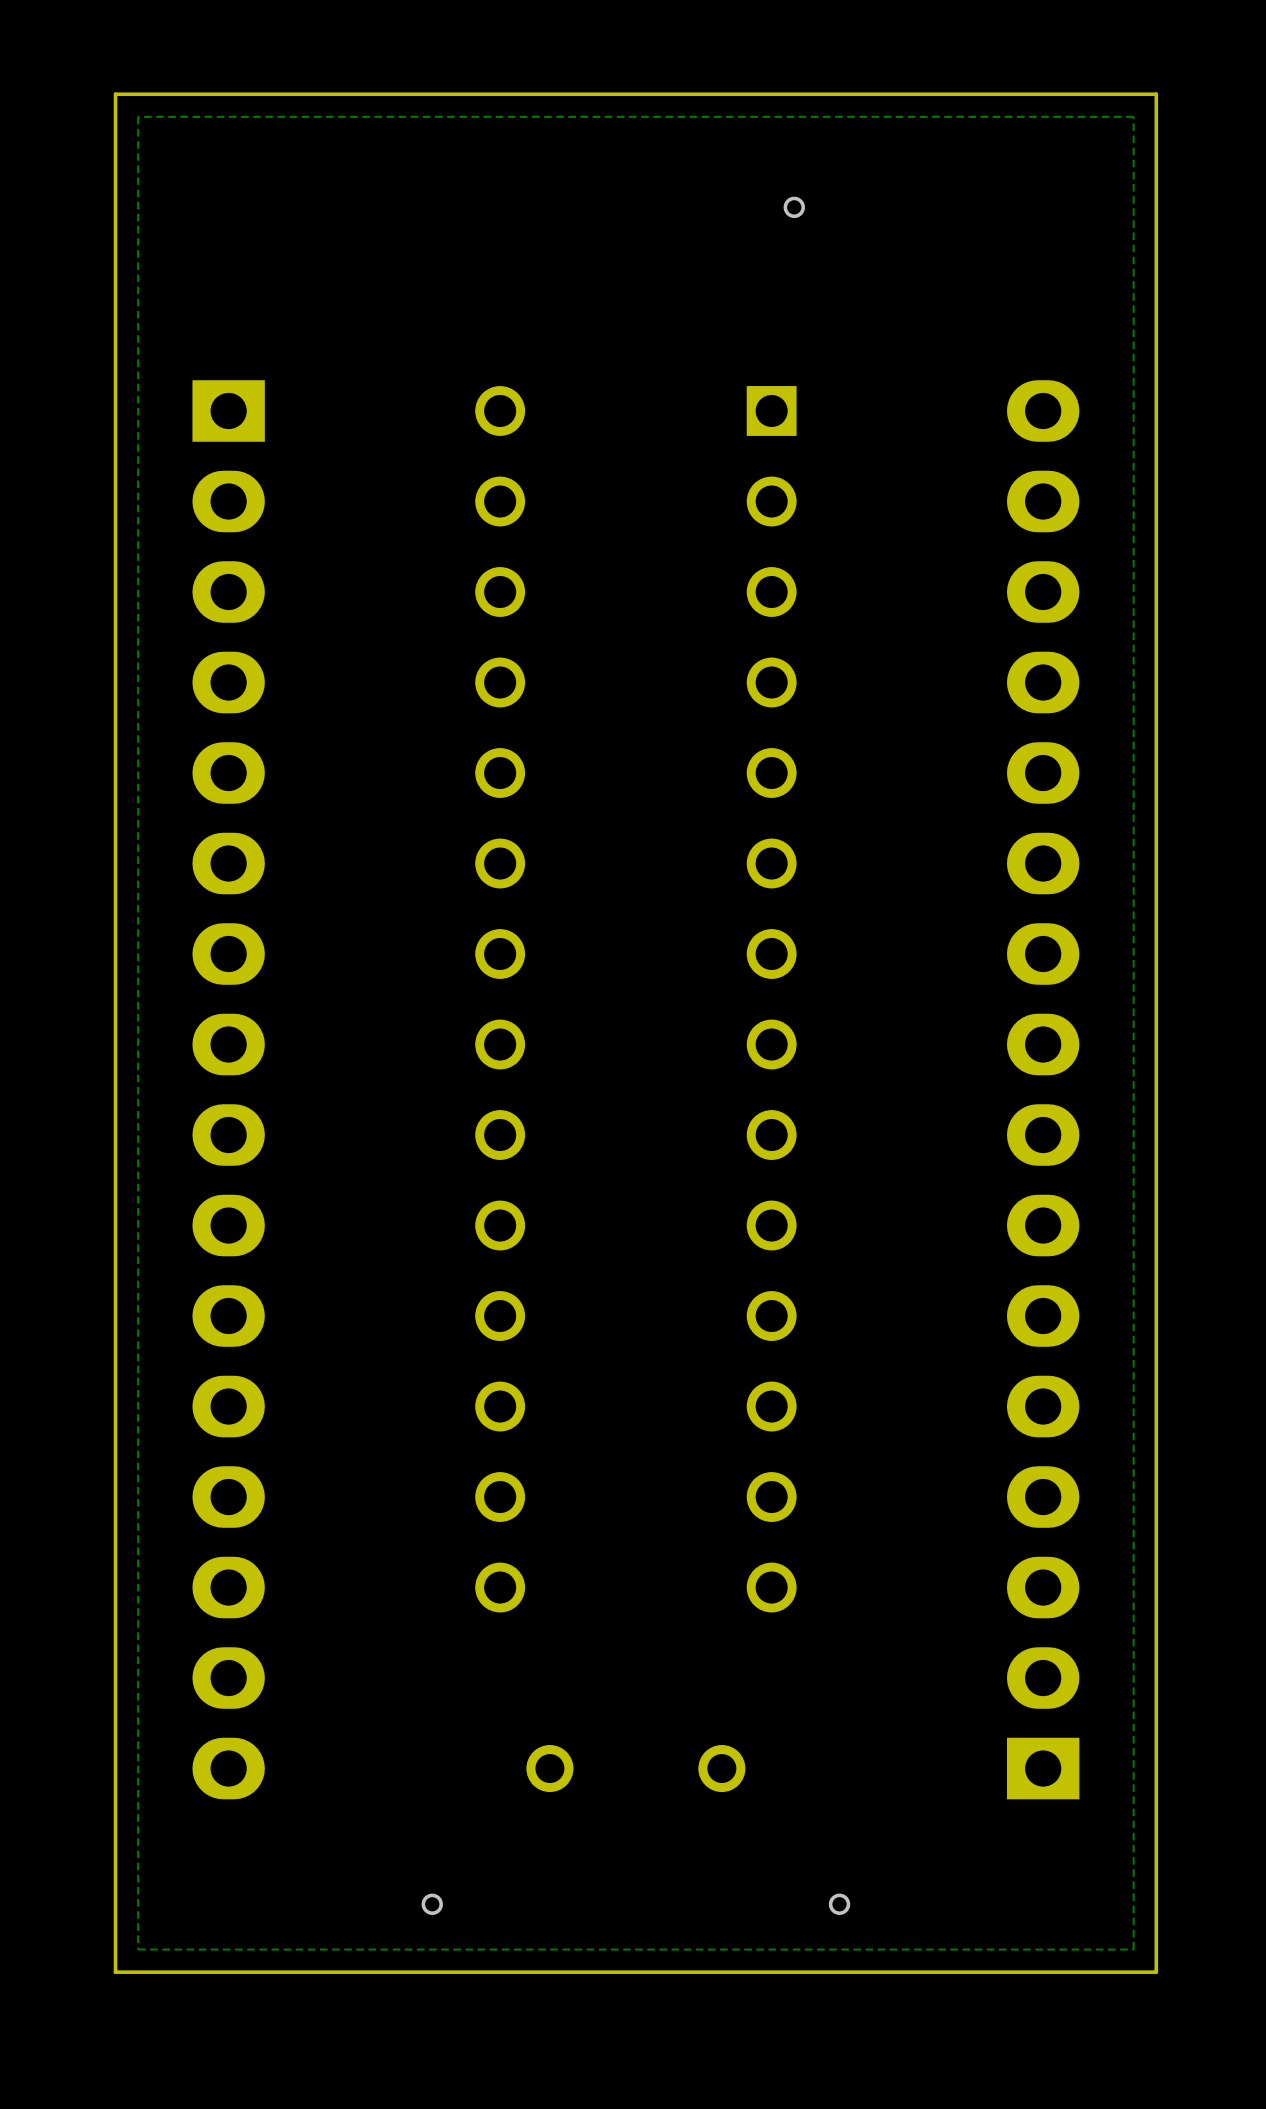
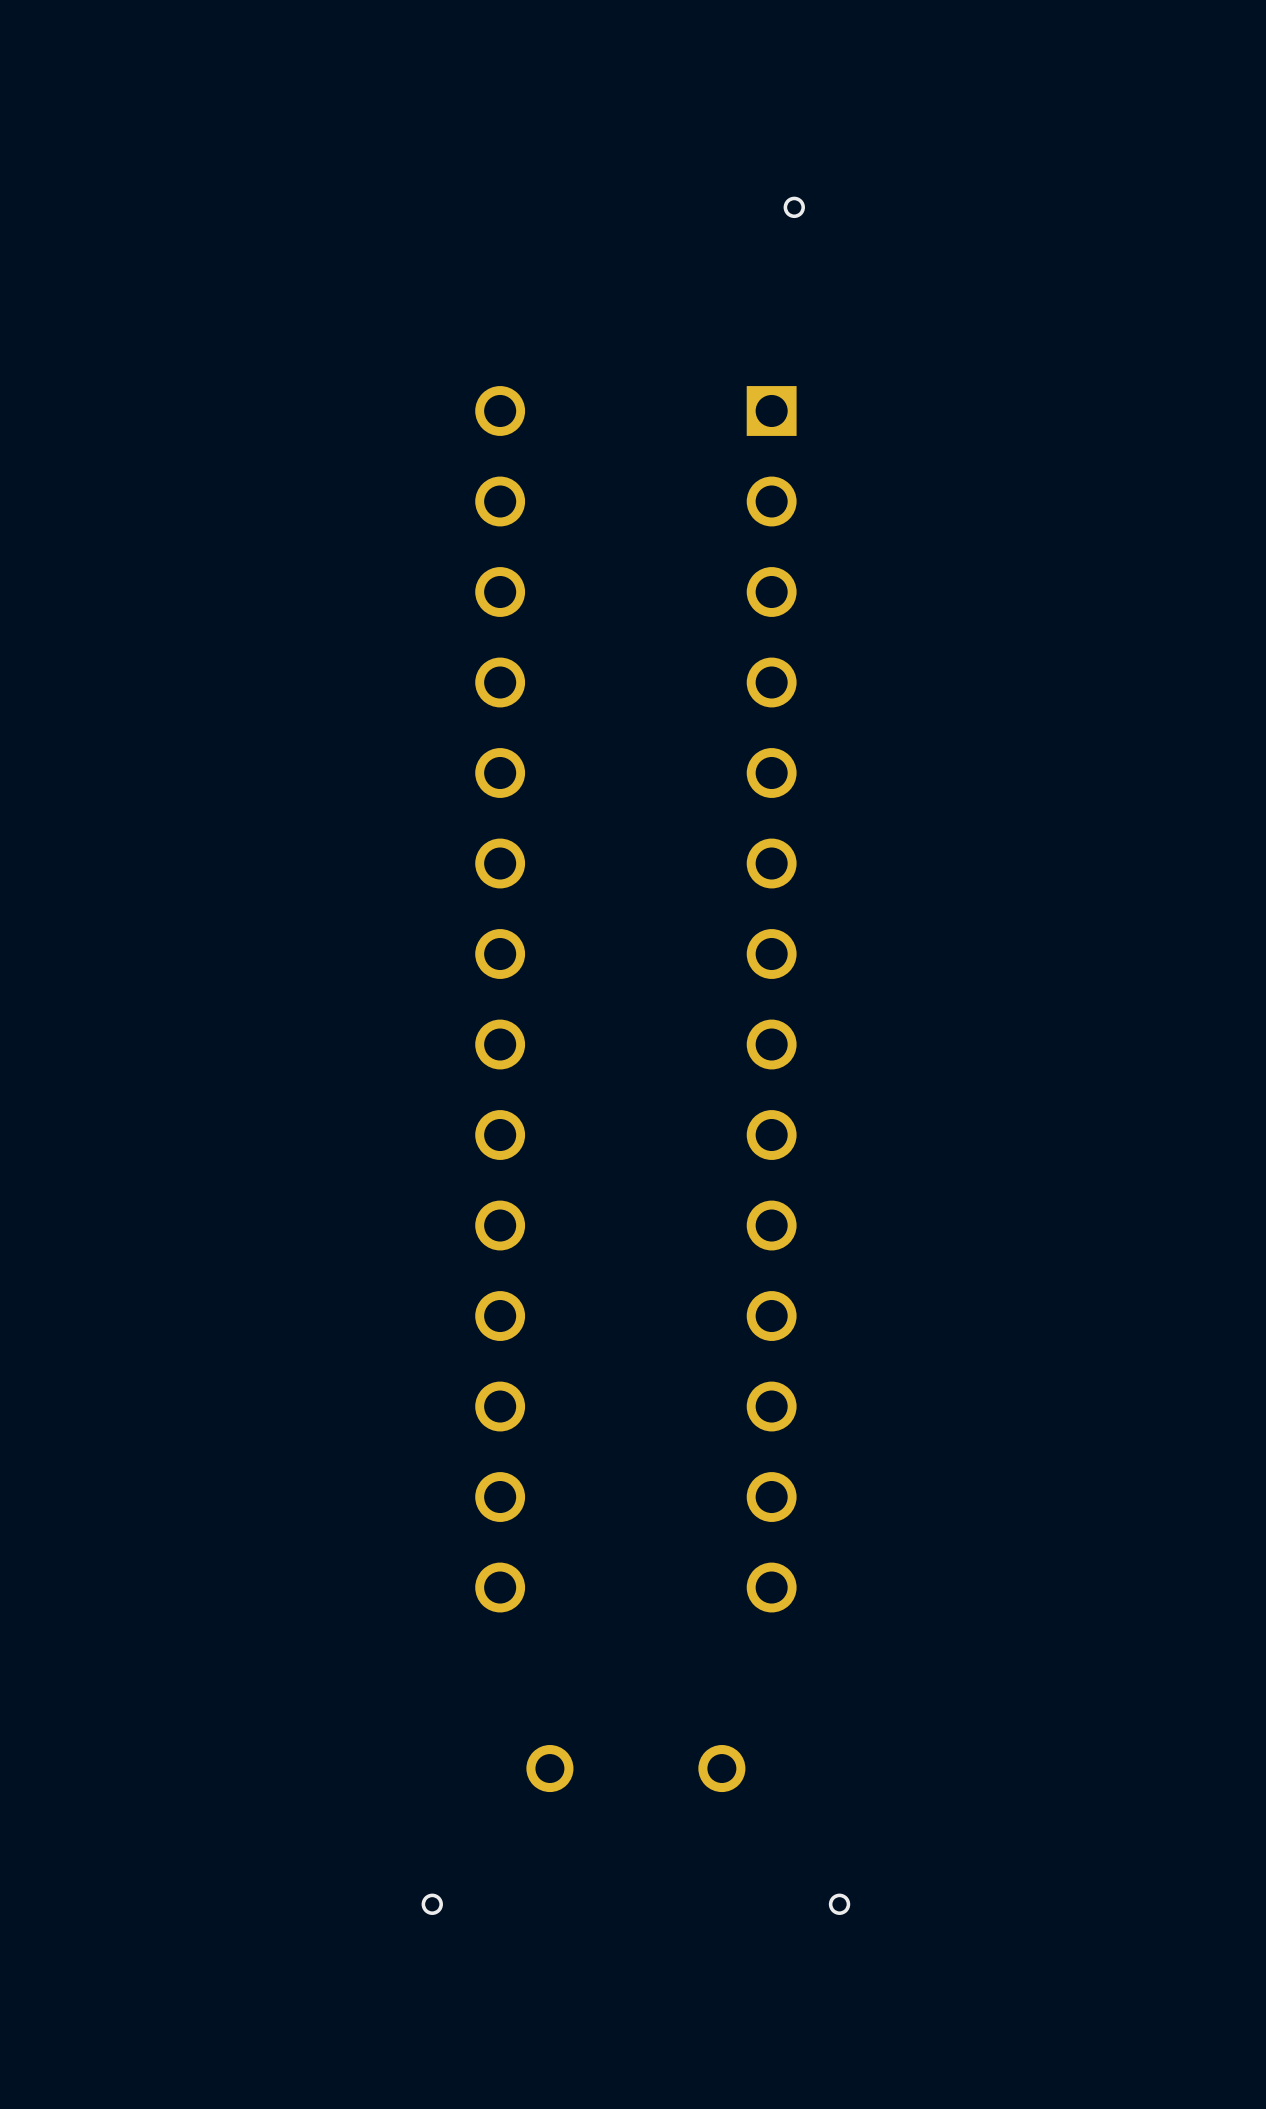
board edge: (1156, 94) (115, 94) (115, 1972) (1156, 1972) (1156, 94) -> none
zone outline: (1133, 116) (138, 116) (138, 1949) (1133, 1949) (1133, 116) -> none
part: (228, 1089) -> none
part: (1043, 1089) -> none

